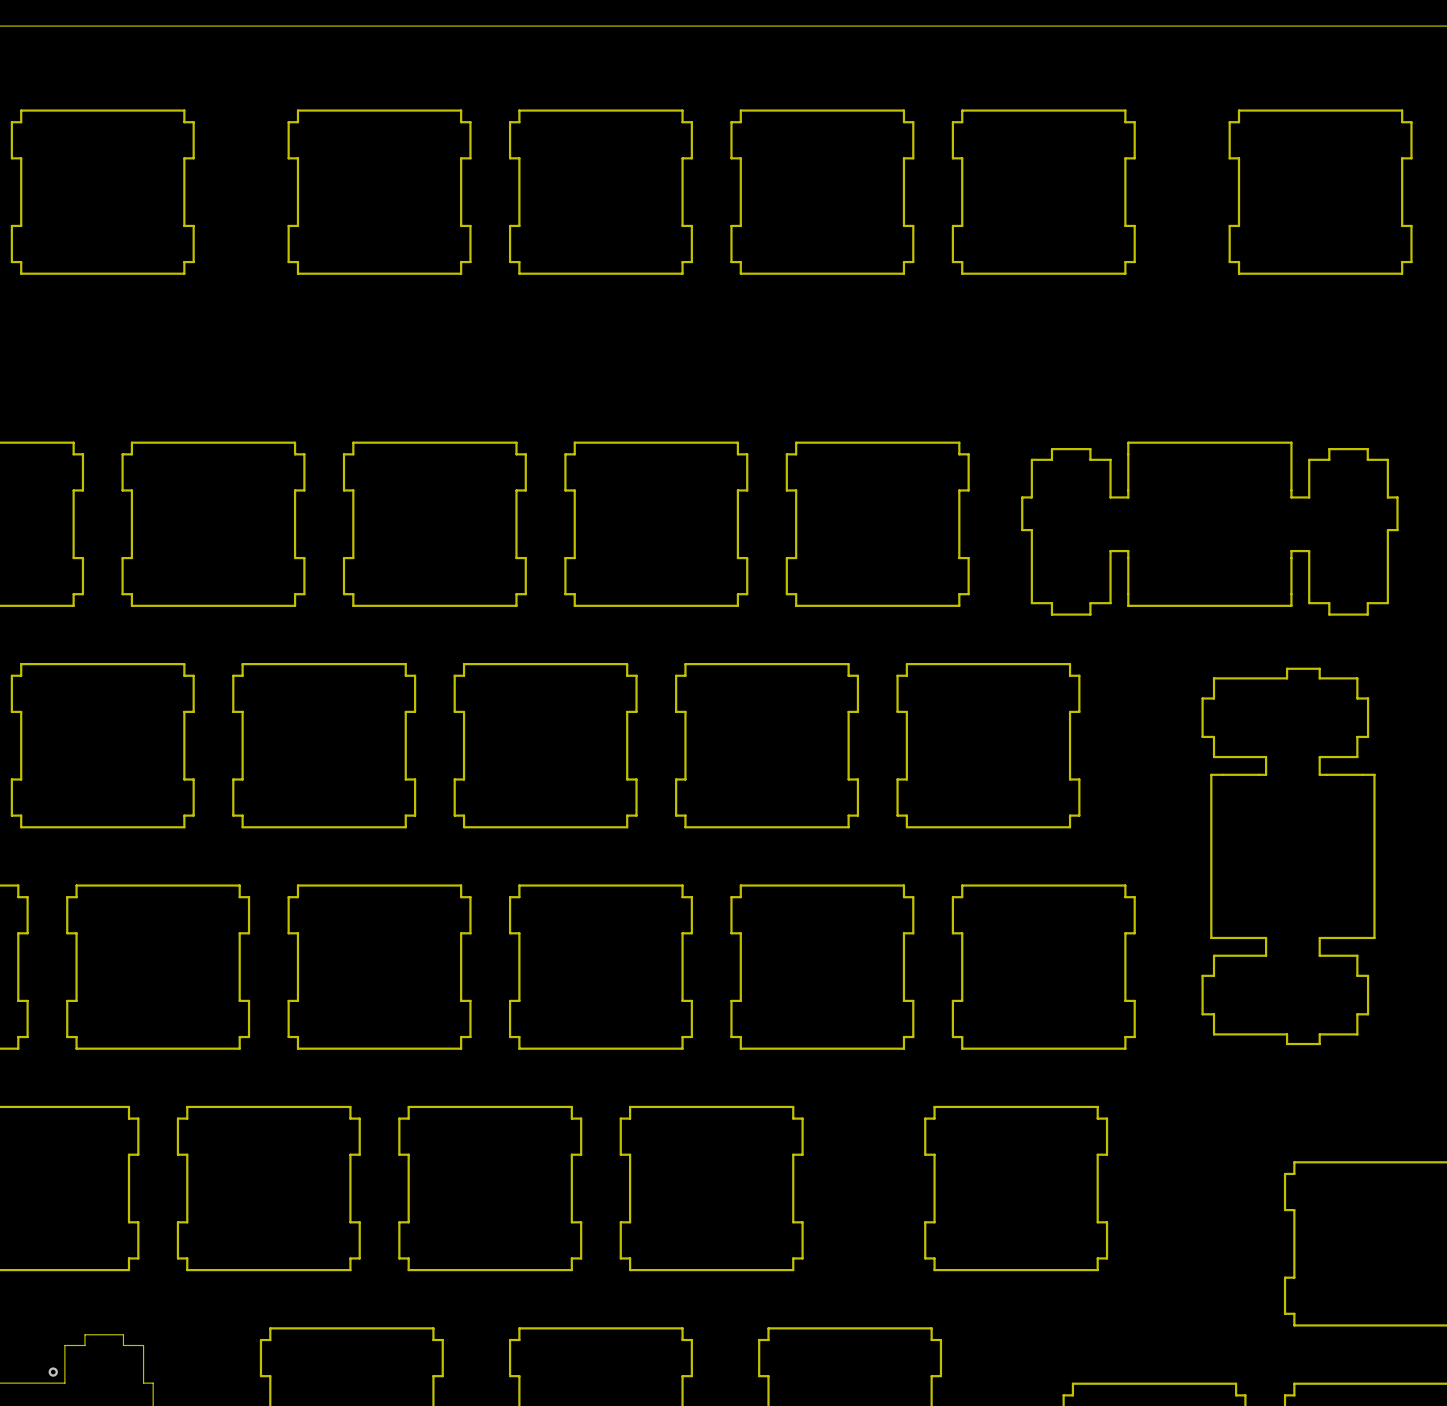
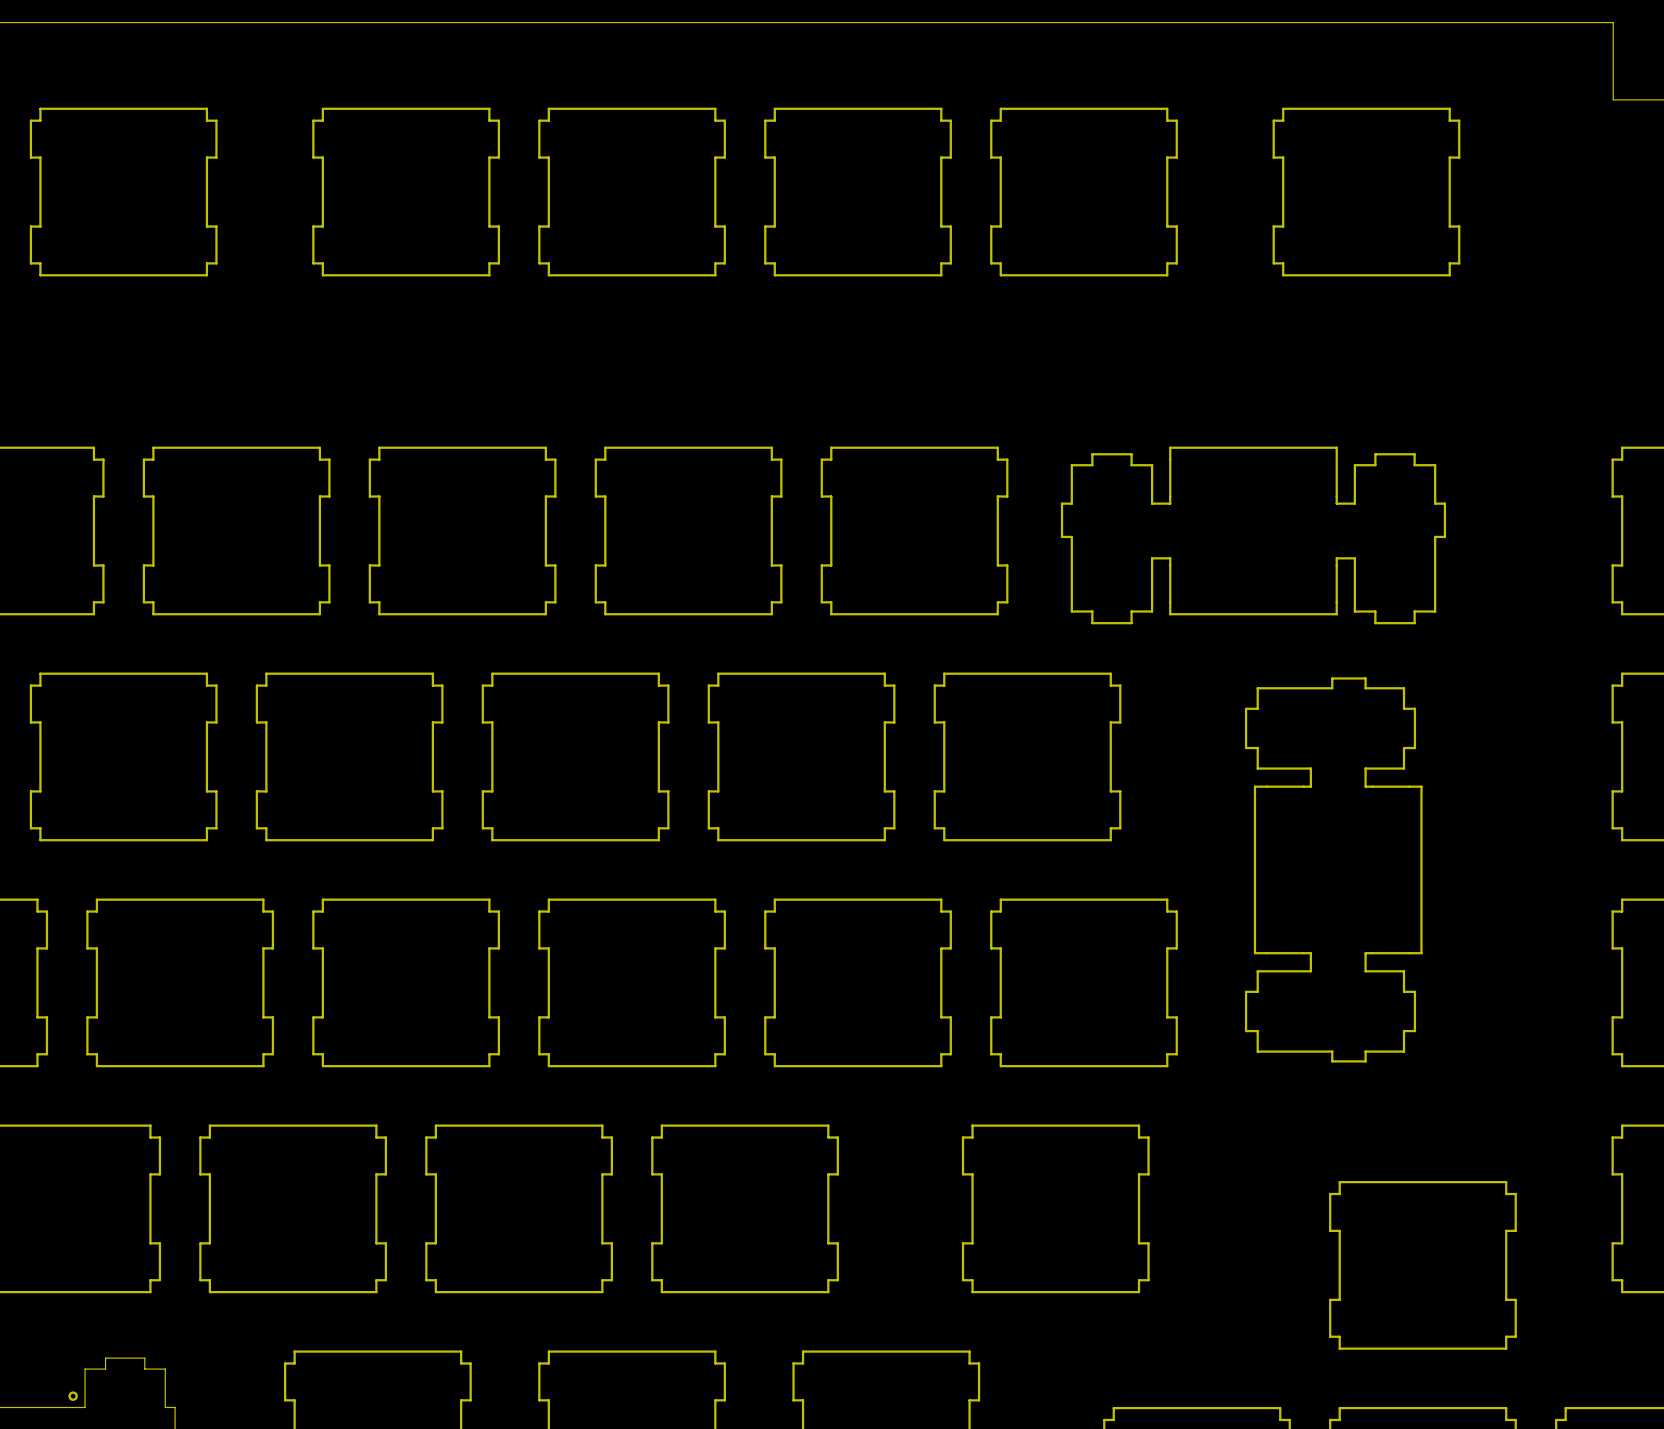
via: (53, 1372) -> none
part: none -> (73, 1396)

